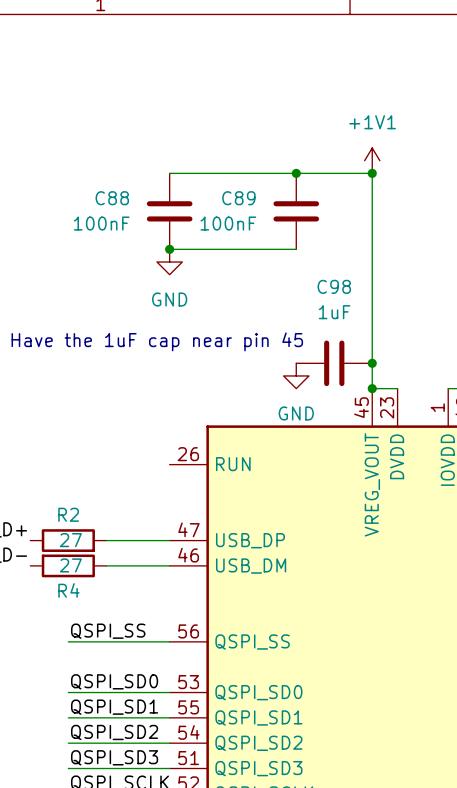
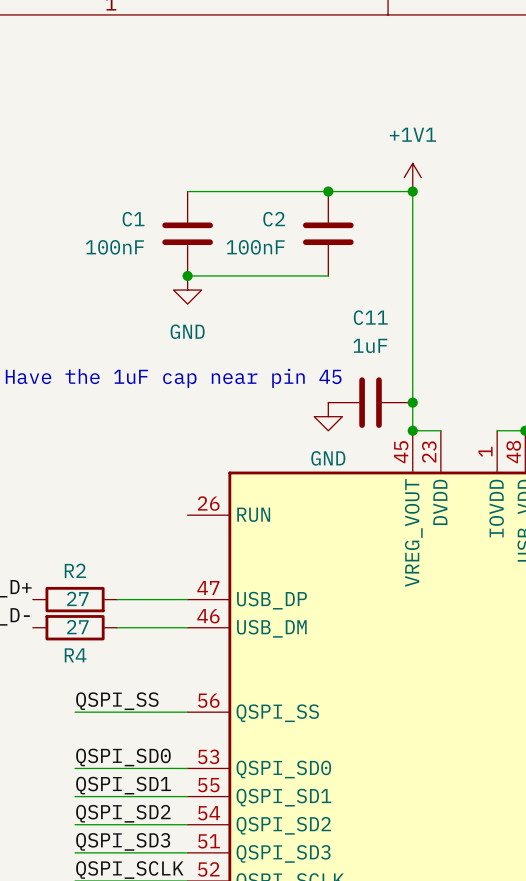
C88 name: C88 (112, 198) -> C1 (133, 219)
C89 name: C89 (238, 198) -> C2 (274, 219)
C98 name: C98 (334, 286) -> C11 (370, 317)

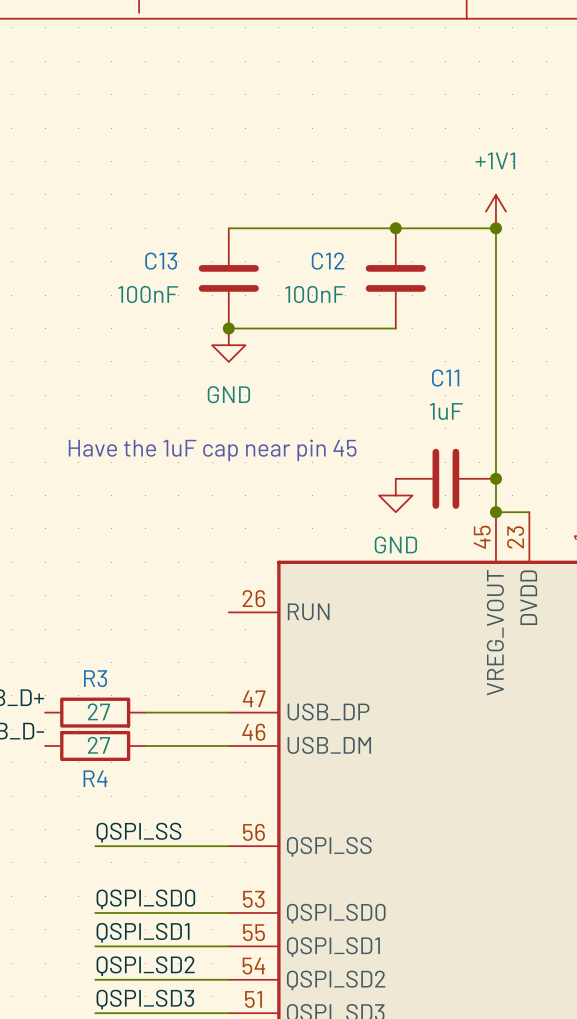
C1 name: C1 (133, 219) -> C13 (161, 261)
C2 name: C2 (274, 219) -> C12 (328, 261)
R2 name: R2 (75, 570) -> R3 (95, 678)

